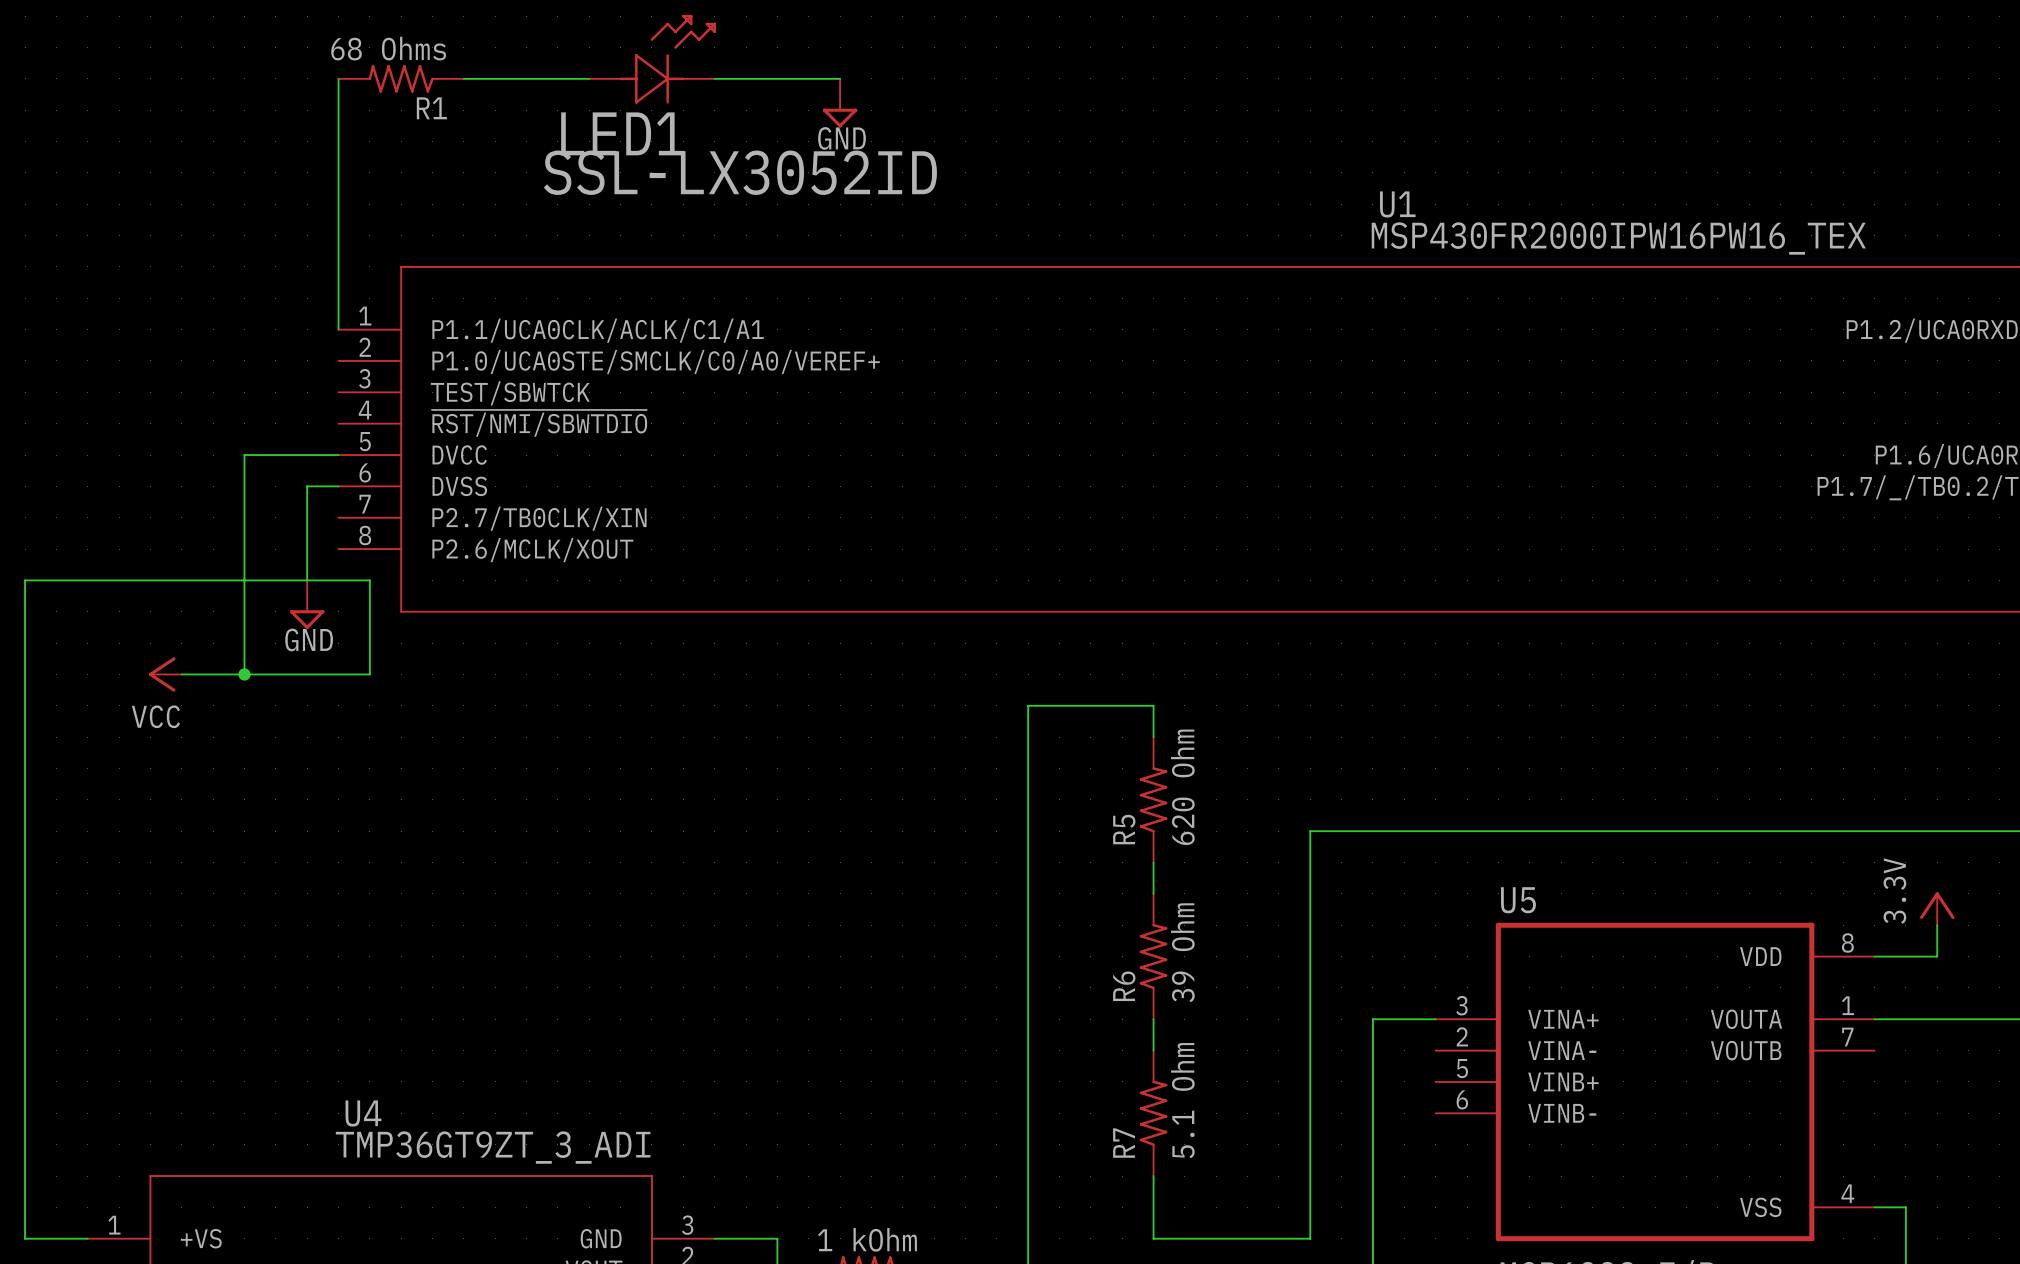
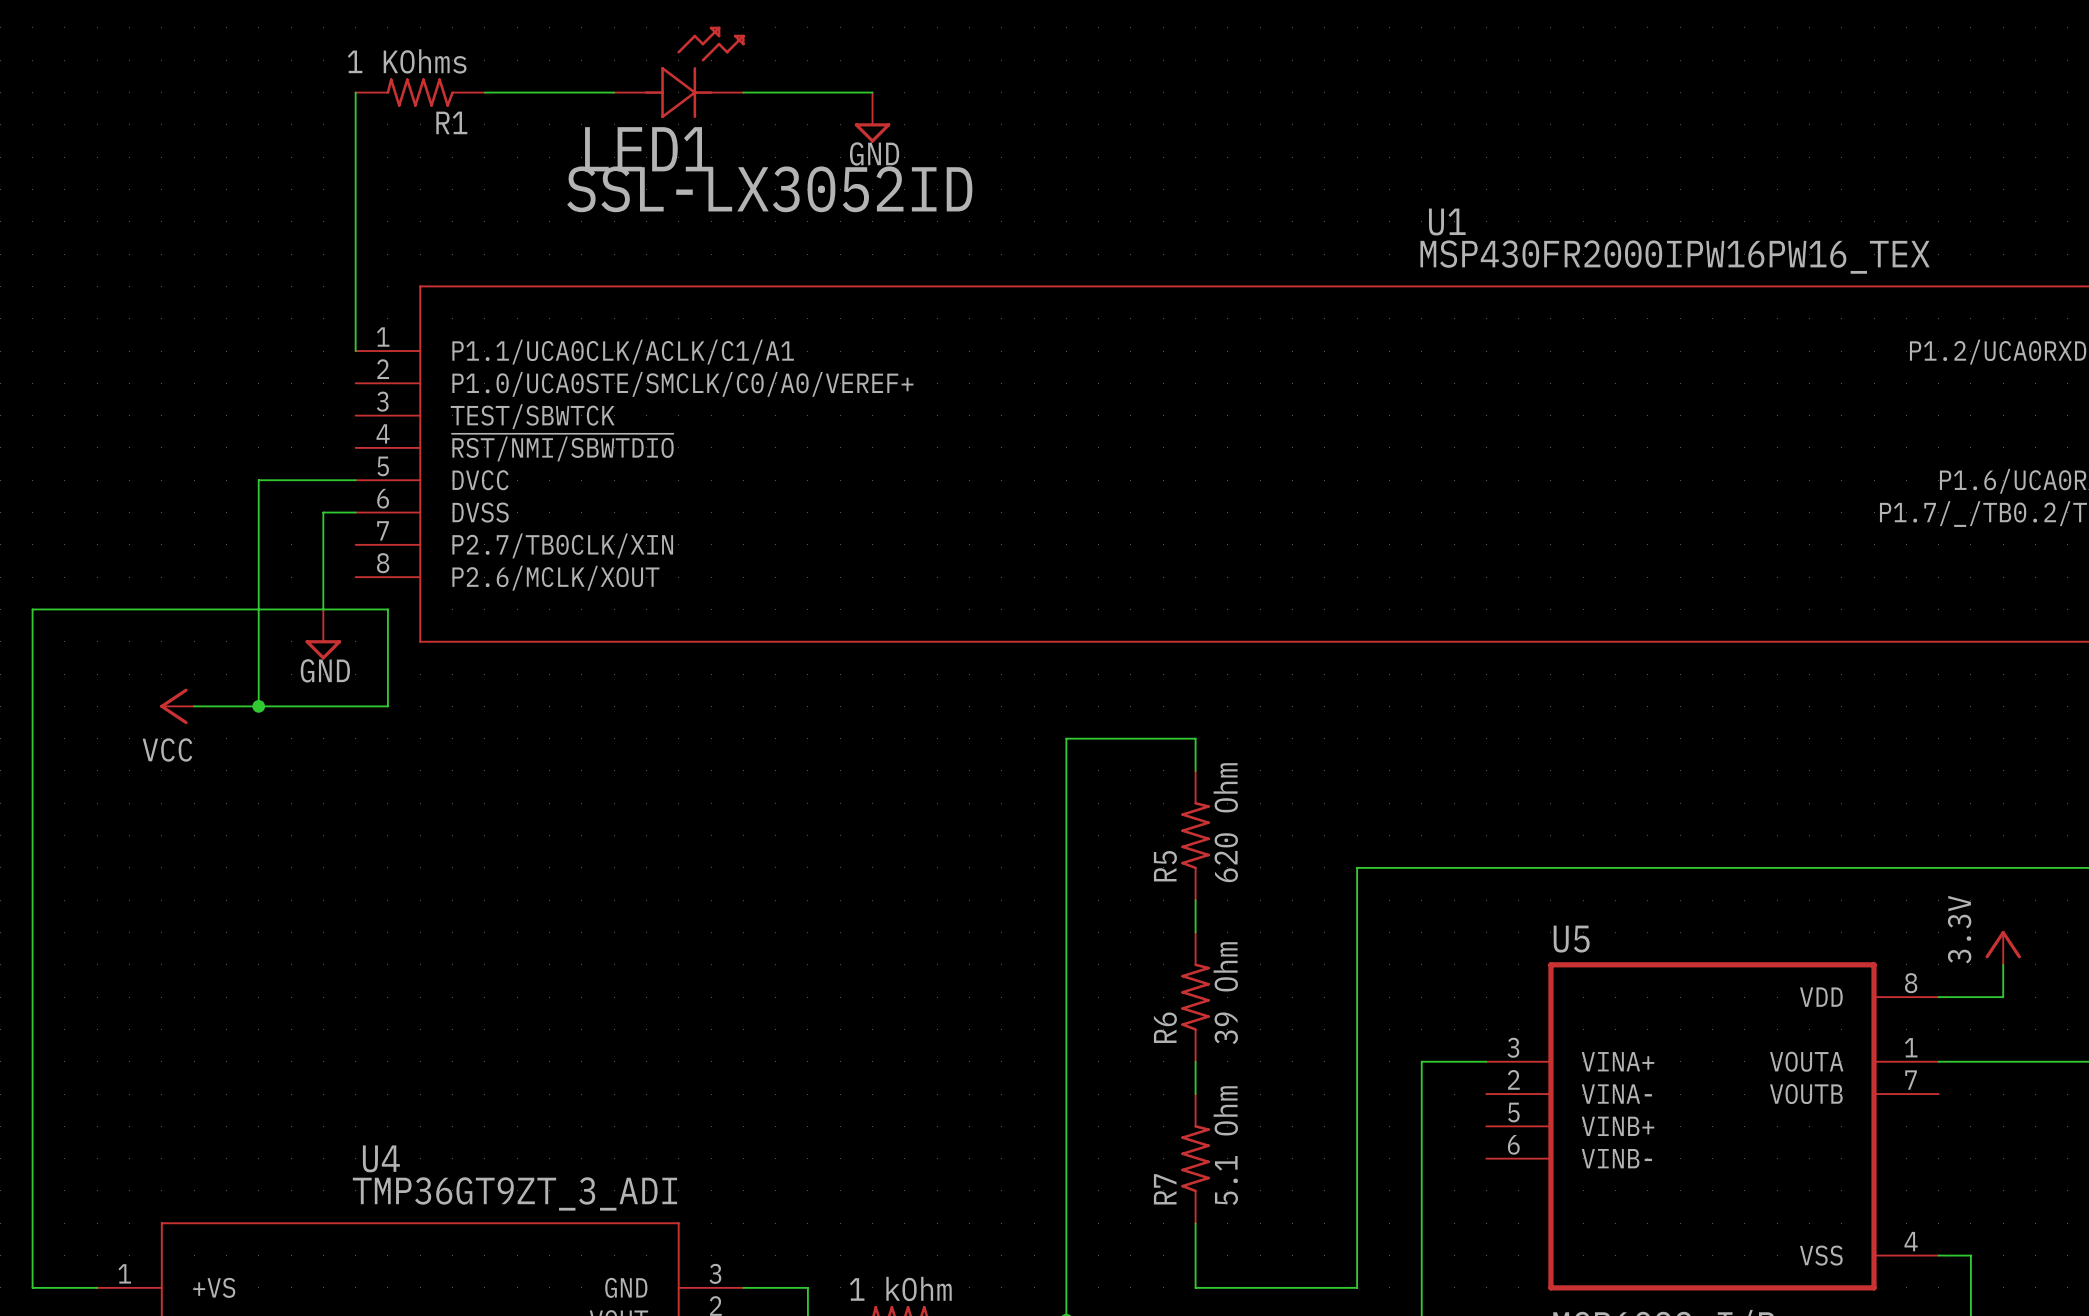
R1 value: 68 Ohms (388, 48) -> 1 KOhms (407, 61)

